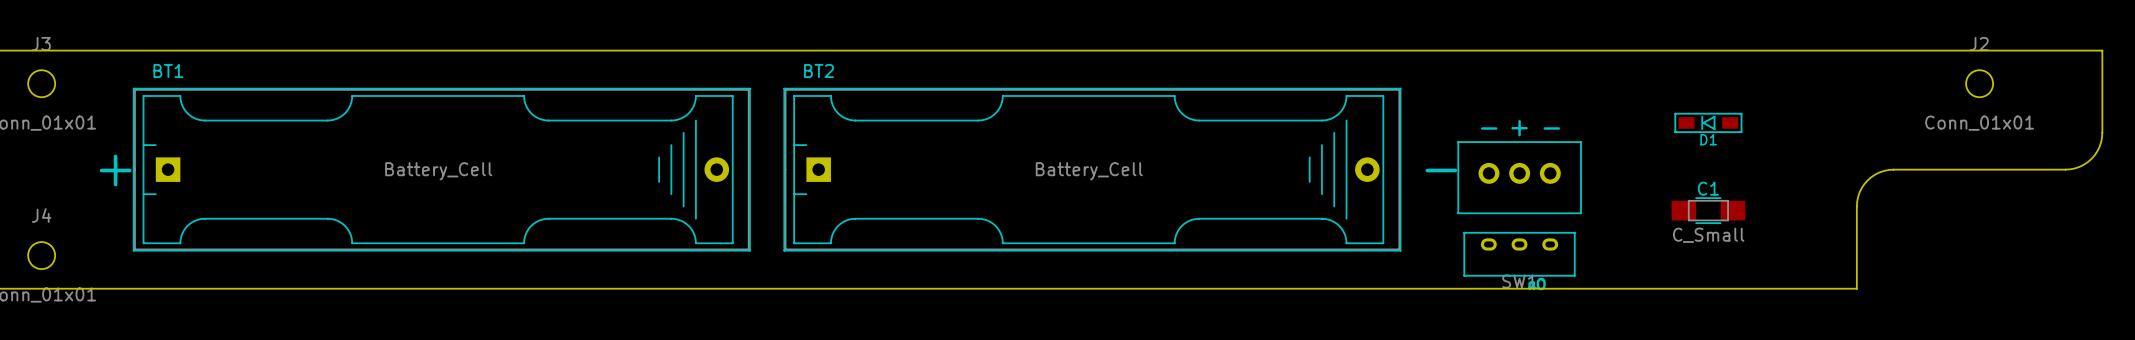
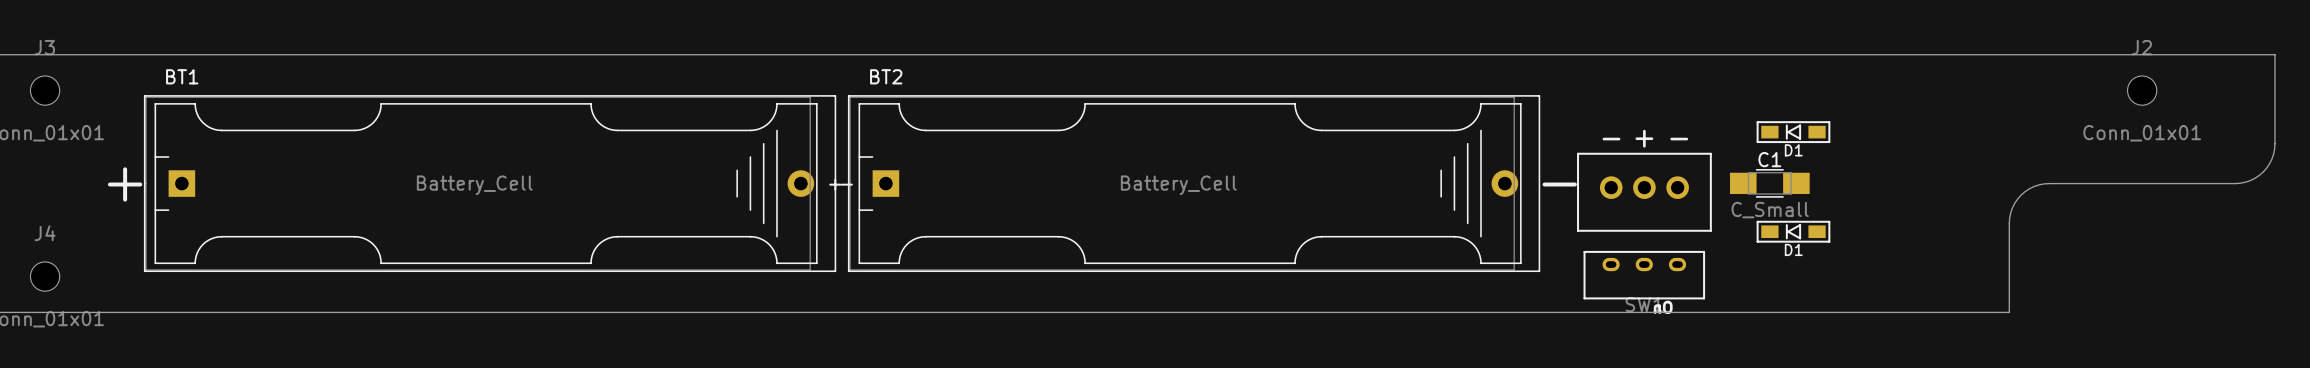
BT1 footprint: [132, 87, 751, 252] -> [143, 95, 837, 273]
BT2 footprint: [783, 87, 1402, 252] -> [847, 95, 1541, 273]
part position: (1708, 122) -> (1793, 132)
C1 position: (1708, 210) -> (1769, 183)
part: none -> (1793, 231)

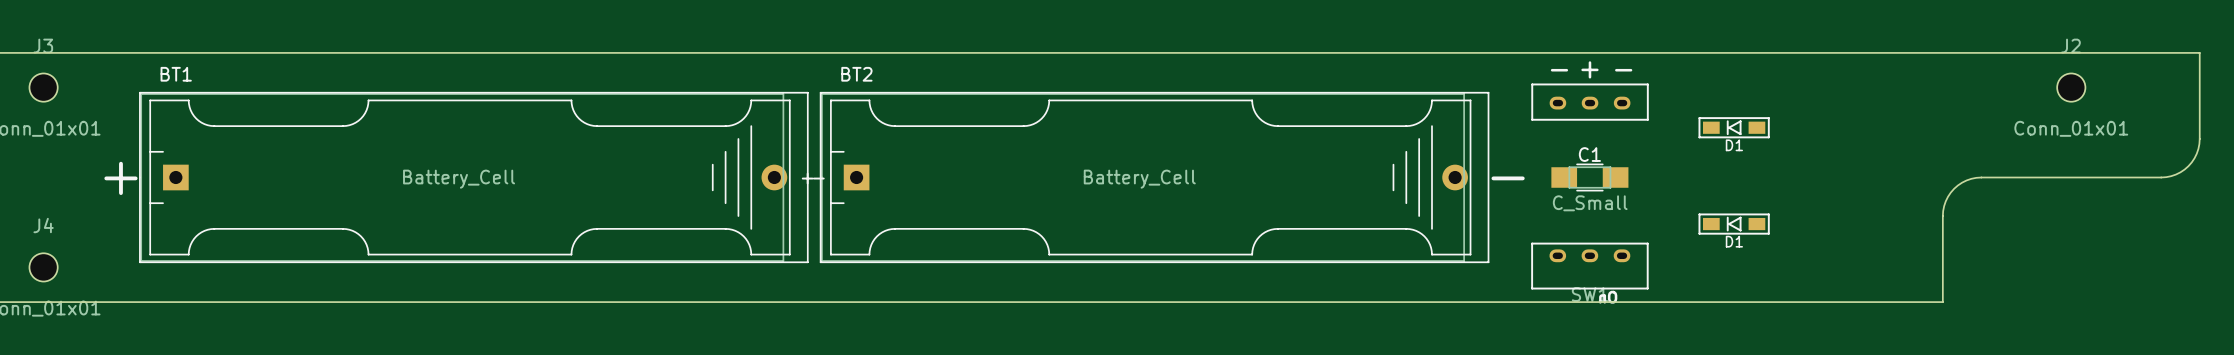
text: none -> - (1559, 70)
text: none -> - (1623, 70)
part: none -> (1590, 102)
text position: + (1644, 138) -> + (1589, 69)
text: - (1611, 139) -> none
text: - (1679, 139) -> none
C1 position: (1769, 183) -> (1589, 177)
part: (1644, 192) -> none

